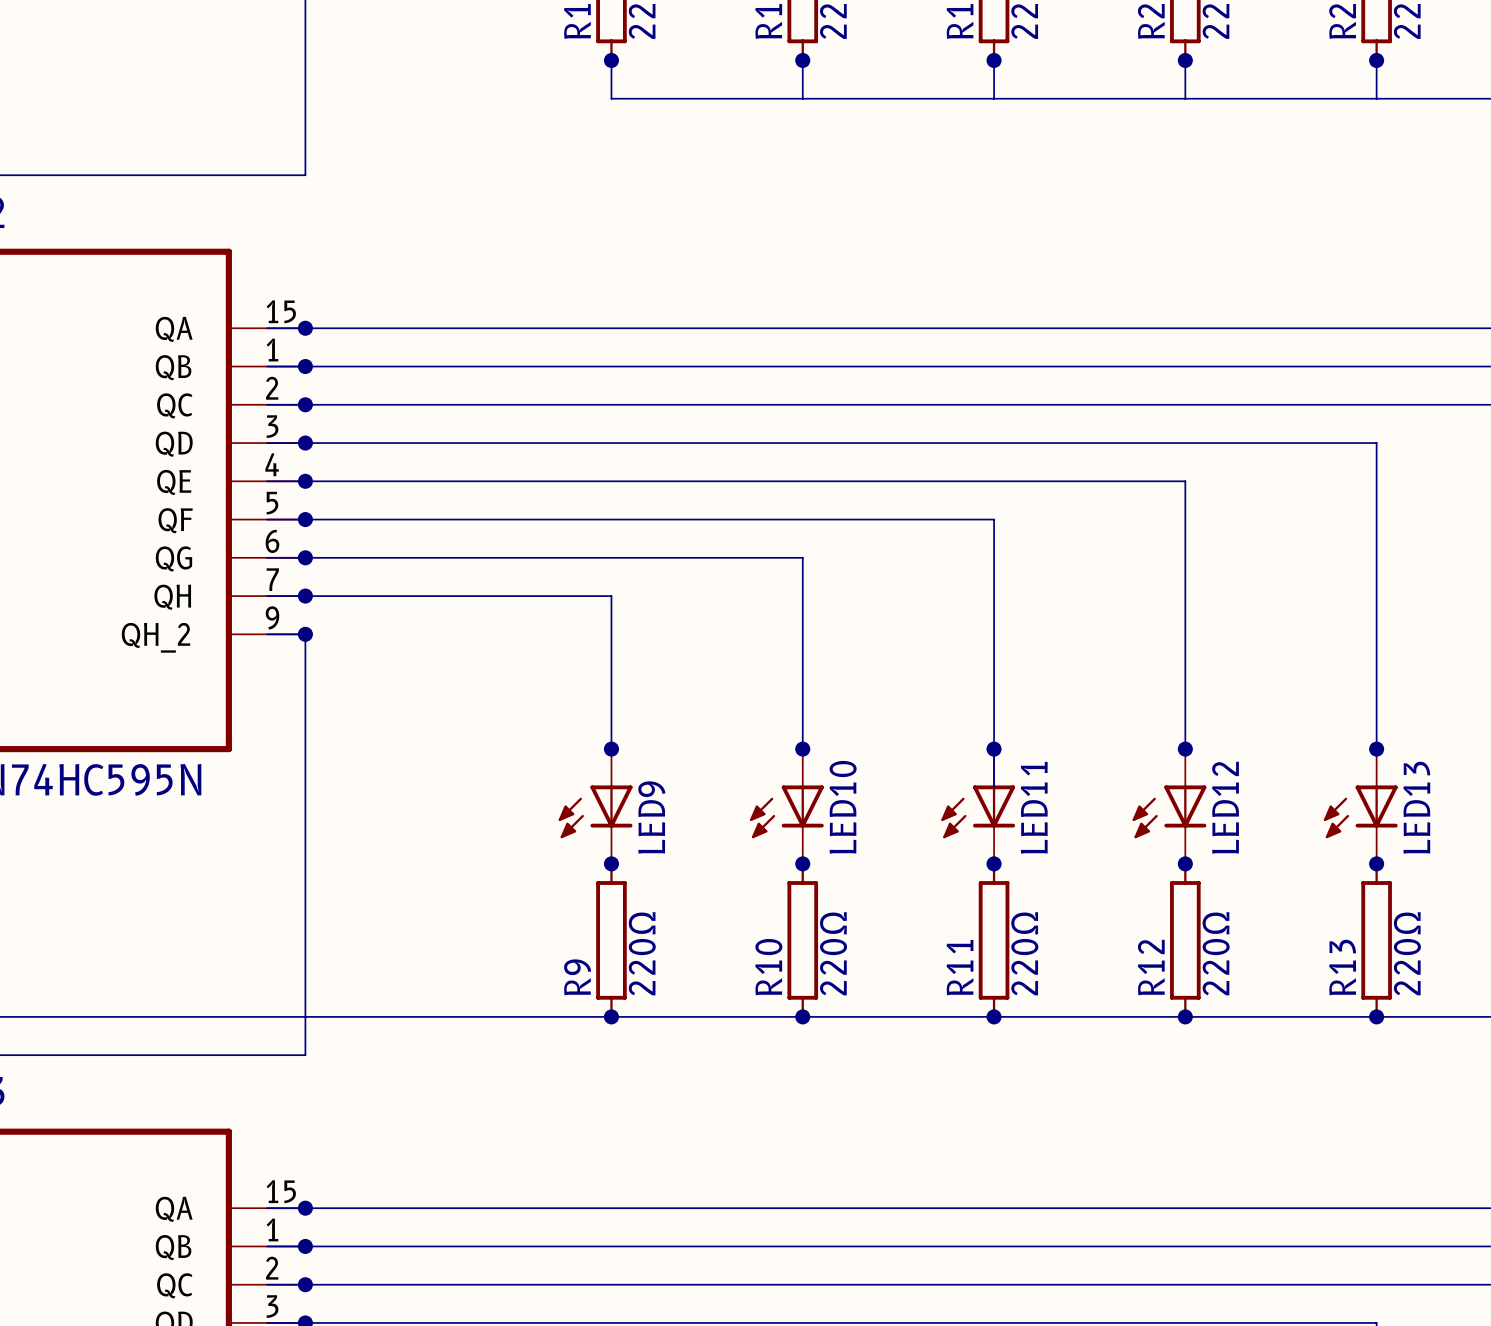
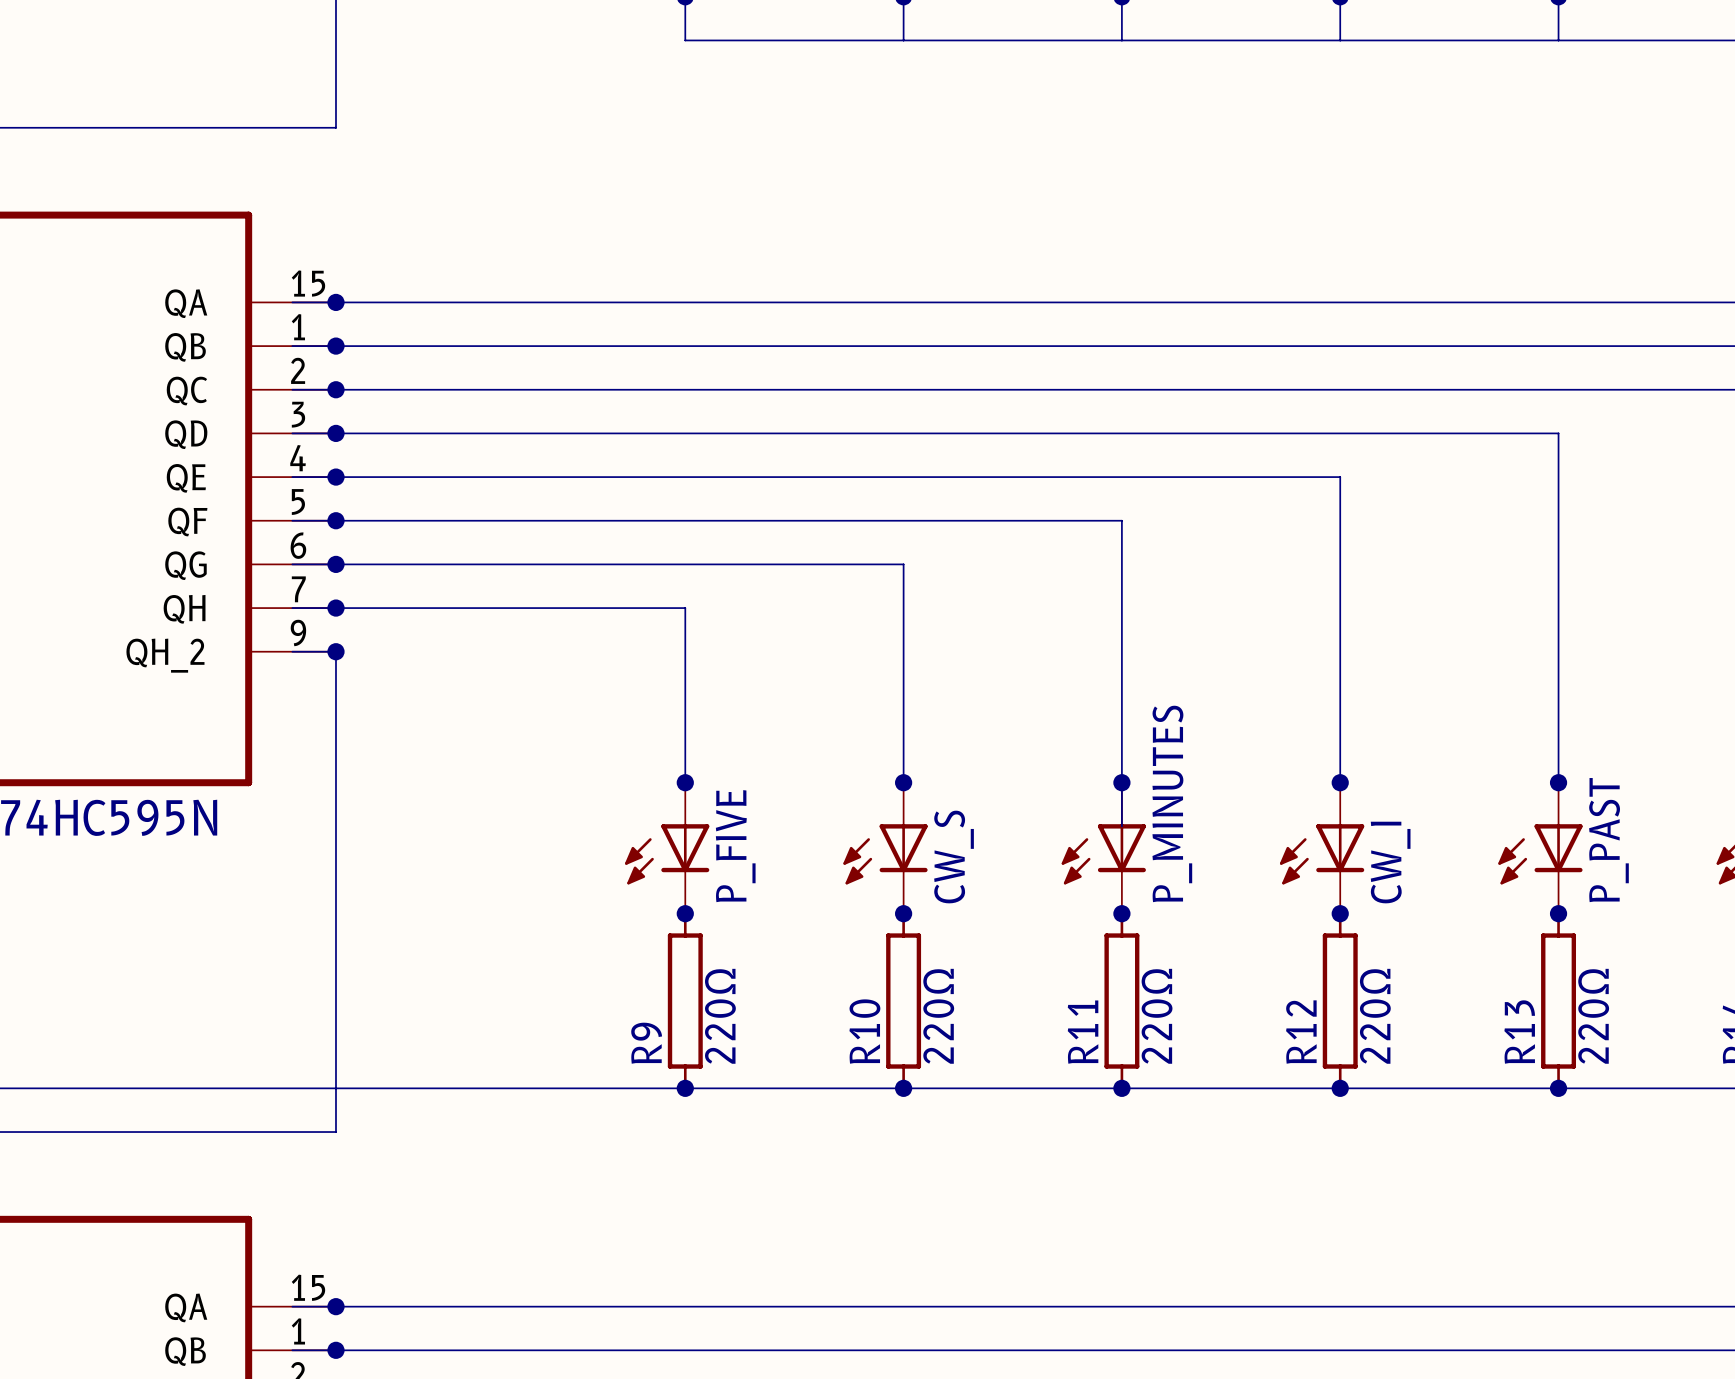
LED10 name: LED10 (843, 807) -> CW_S (954, 857)
LED11 name: LED11 (1034, 807) -> P_MINUTES (1172, 803)
LED12 name: LED12 (1225, 807) -> CW_I (1390, 862)
LED13 name: LED13 (1416, 807) -> P_PAST (1608, 840)
LED9 name: LED9 (651, 817) -> P_FIVE (735, 846)

